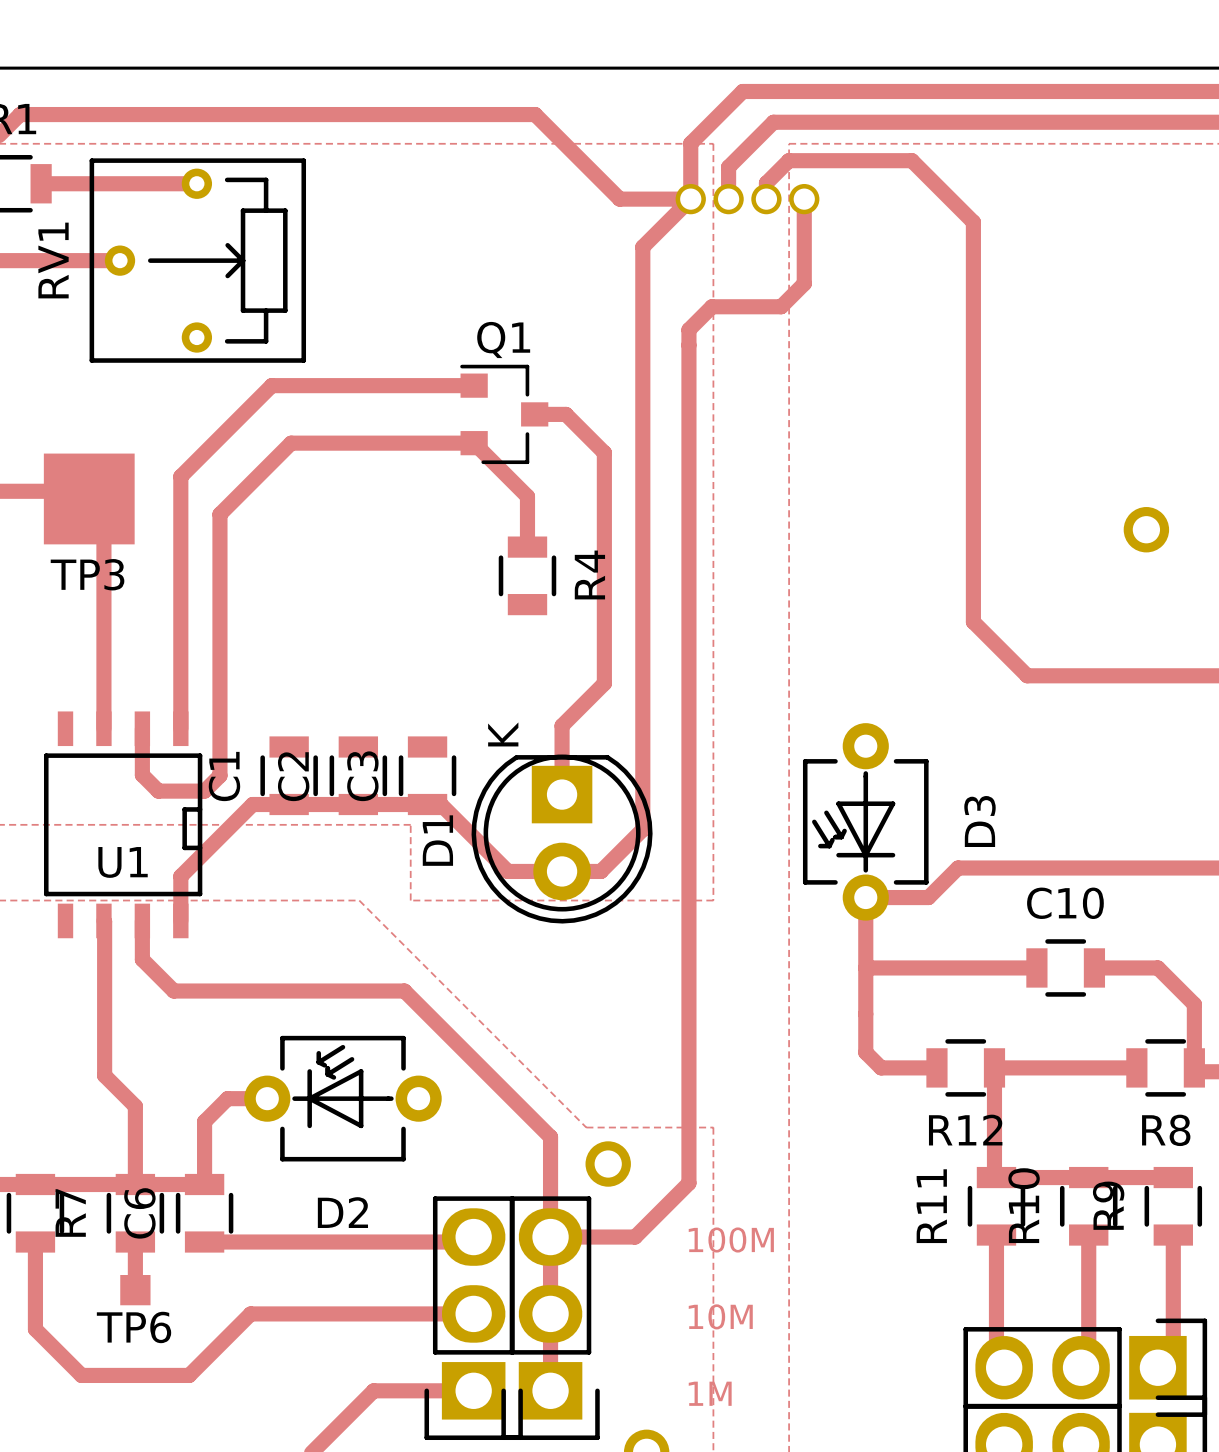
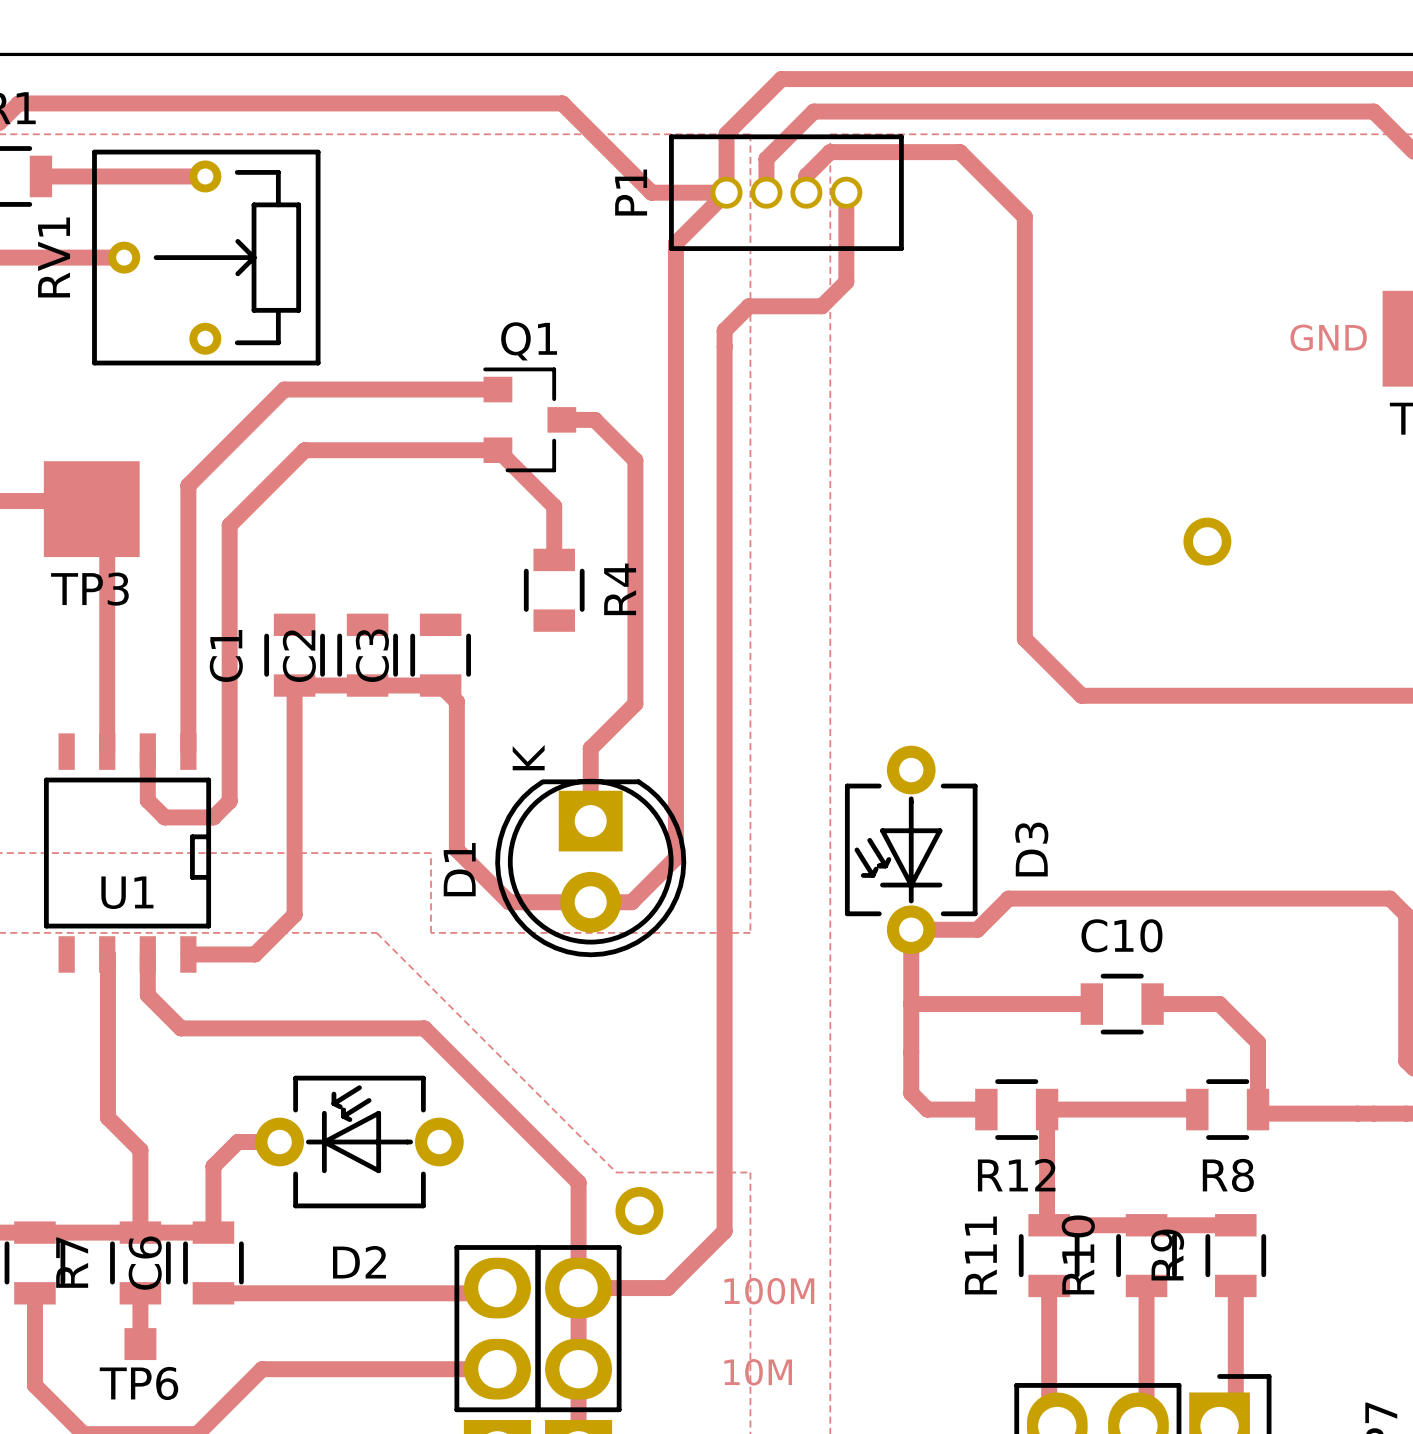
P1 side: bottom (747, 199) -> top (786, 192)
C1 position: (289, 775) -> (294, 655)
C2 position: (358, 775) -> (367, 655)
C3 position: (427, 775) -> (440, 655)
top track: (507, 871) (440, 804) (252, 804) (180, 876) (180, 920) -> (533, 902) (509, 902) (456, 849) (456, 701) (440, 685) (294, 685) (294, 914) (254, 954) (188, 954)

